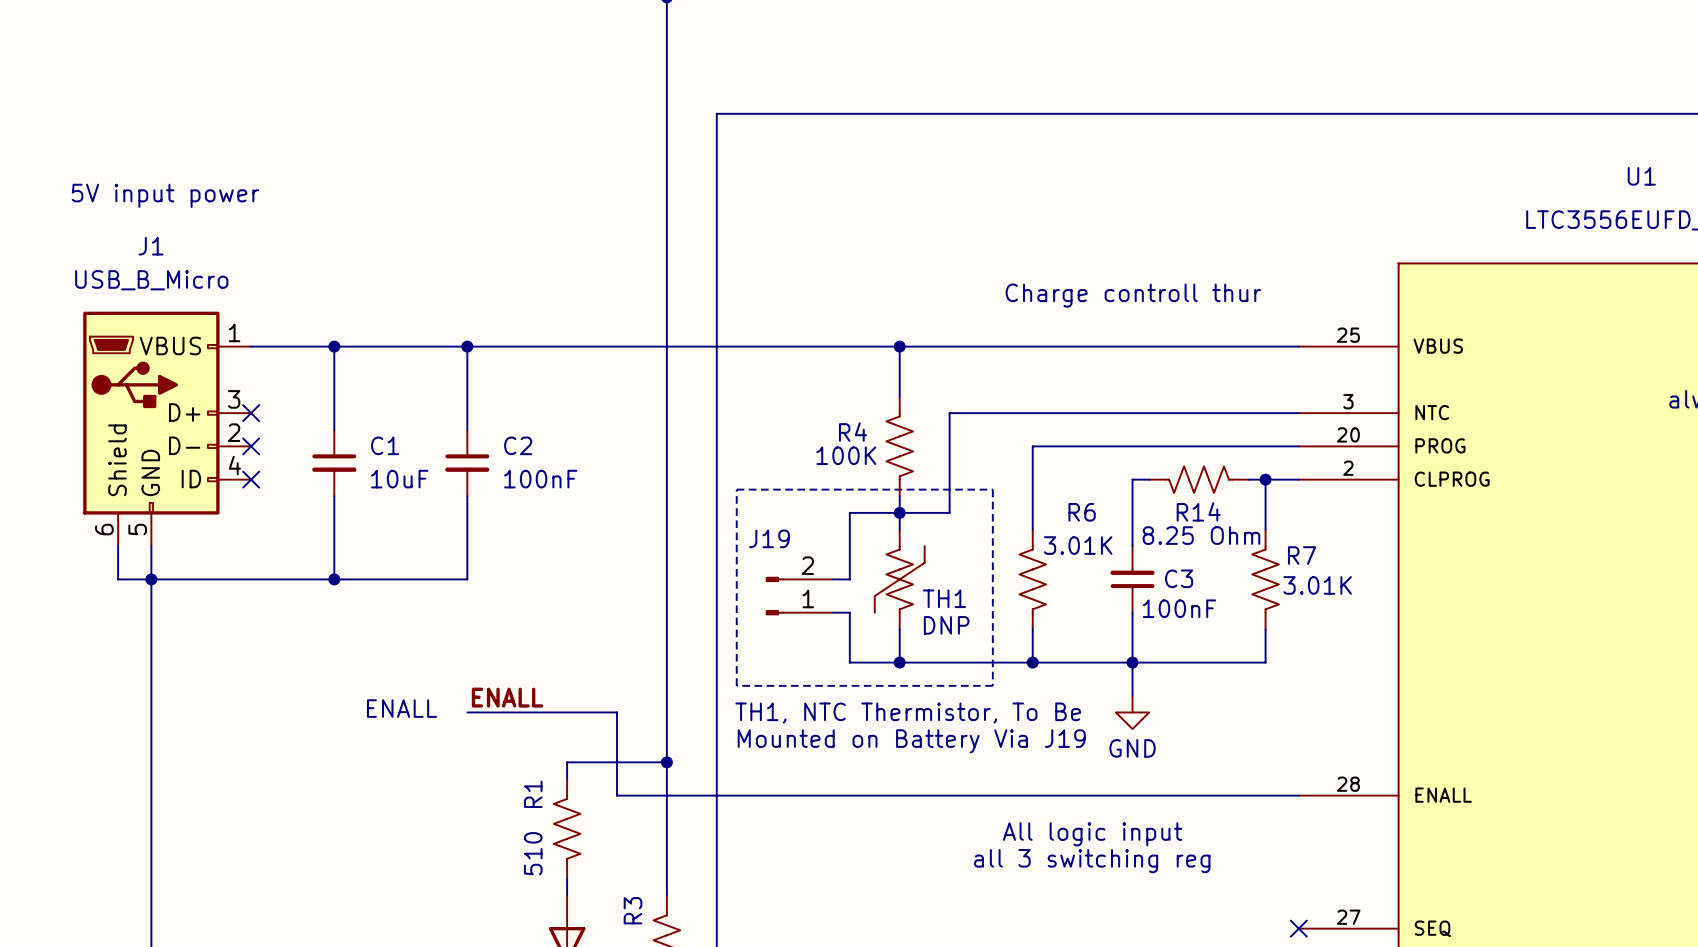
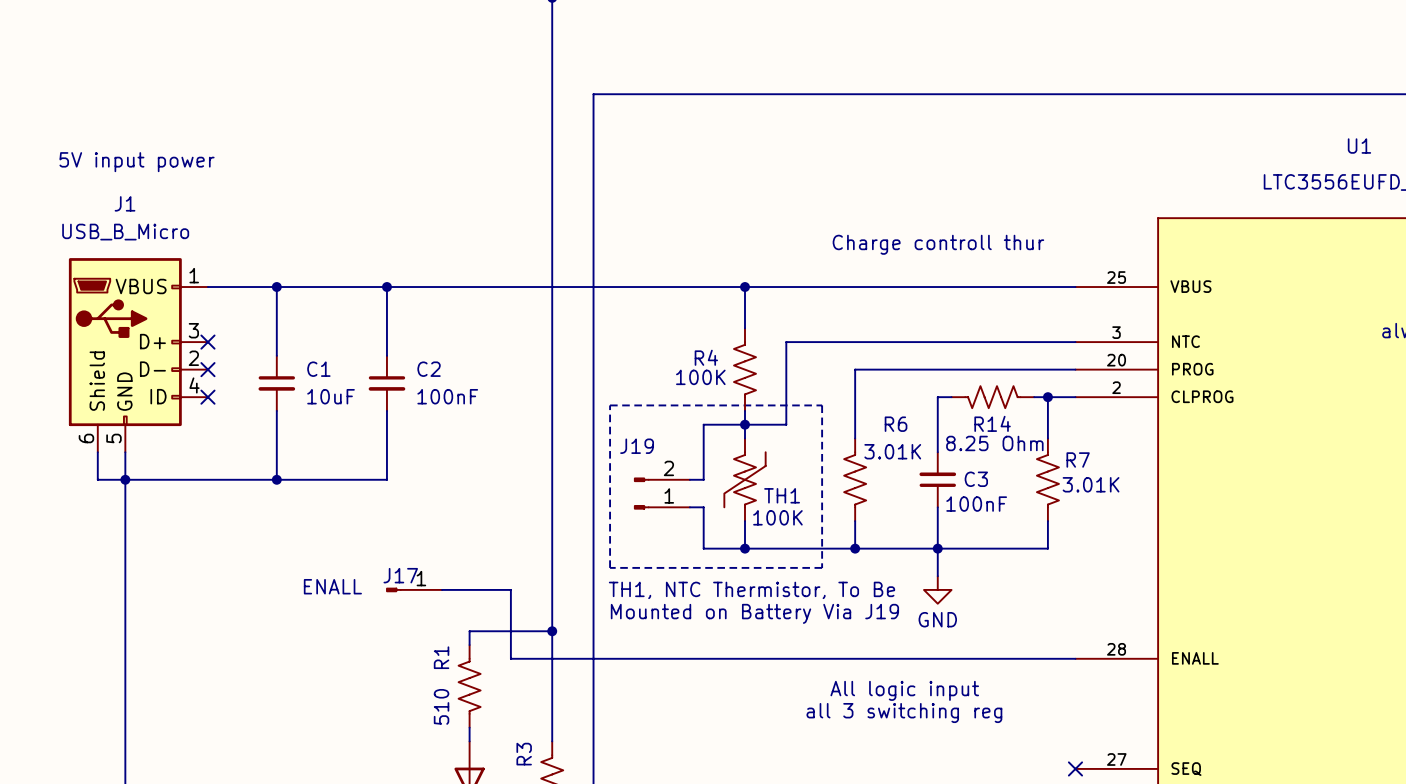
TH1 value: DNP (946, 625) -> 100K (777, 517)
label: ENALL (507, 697) -> none
J17: none -> (414, 589)

